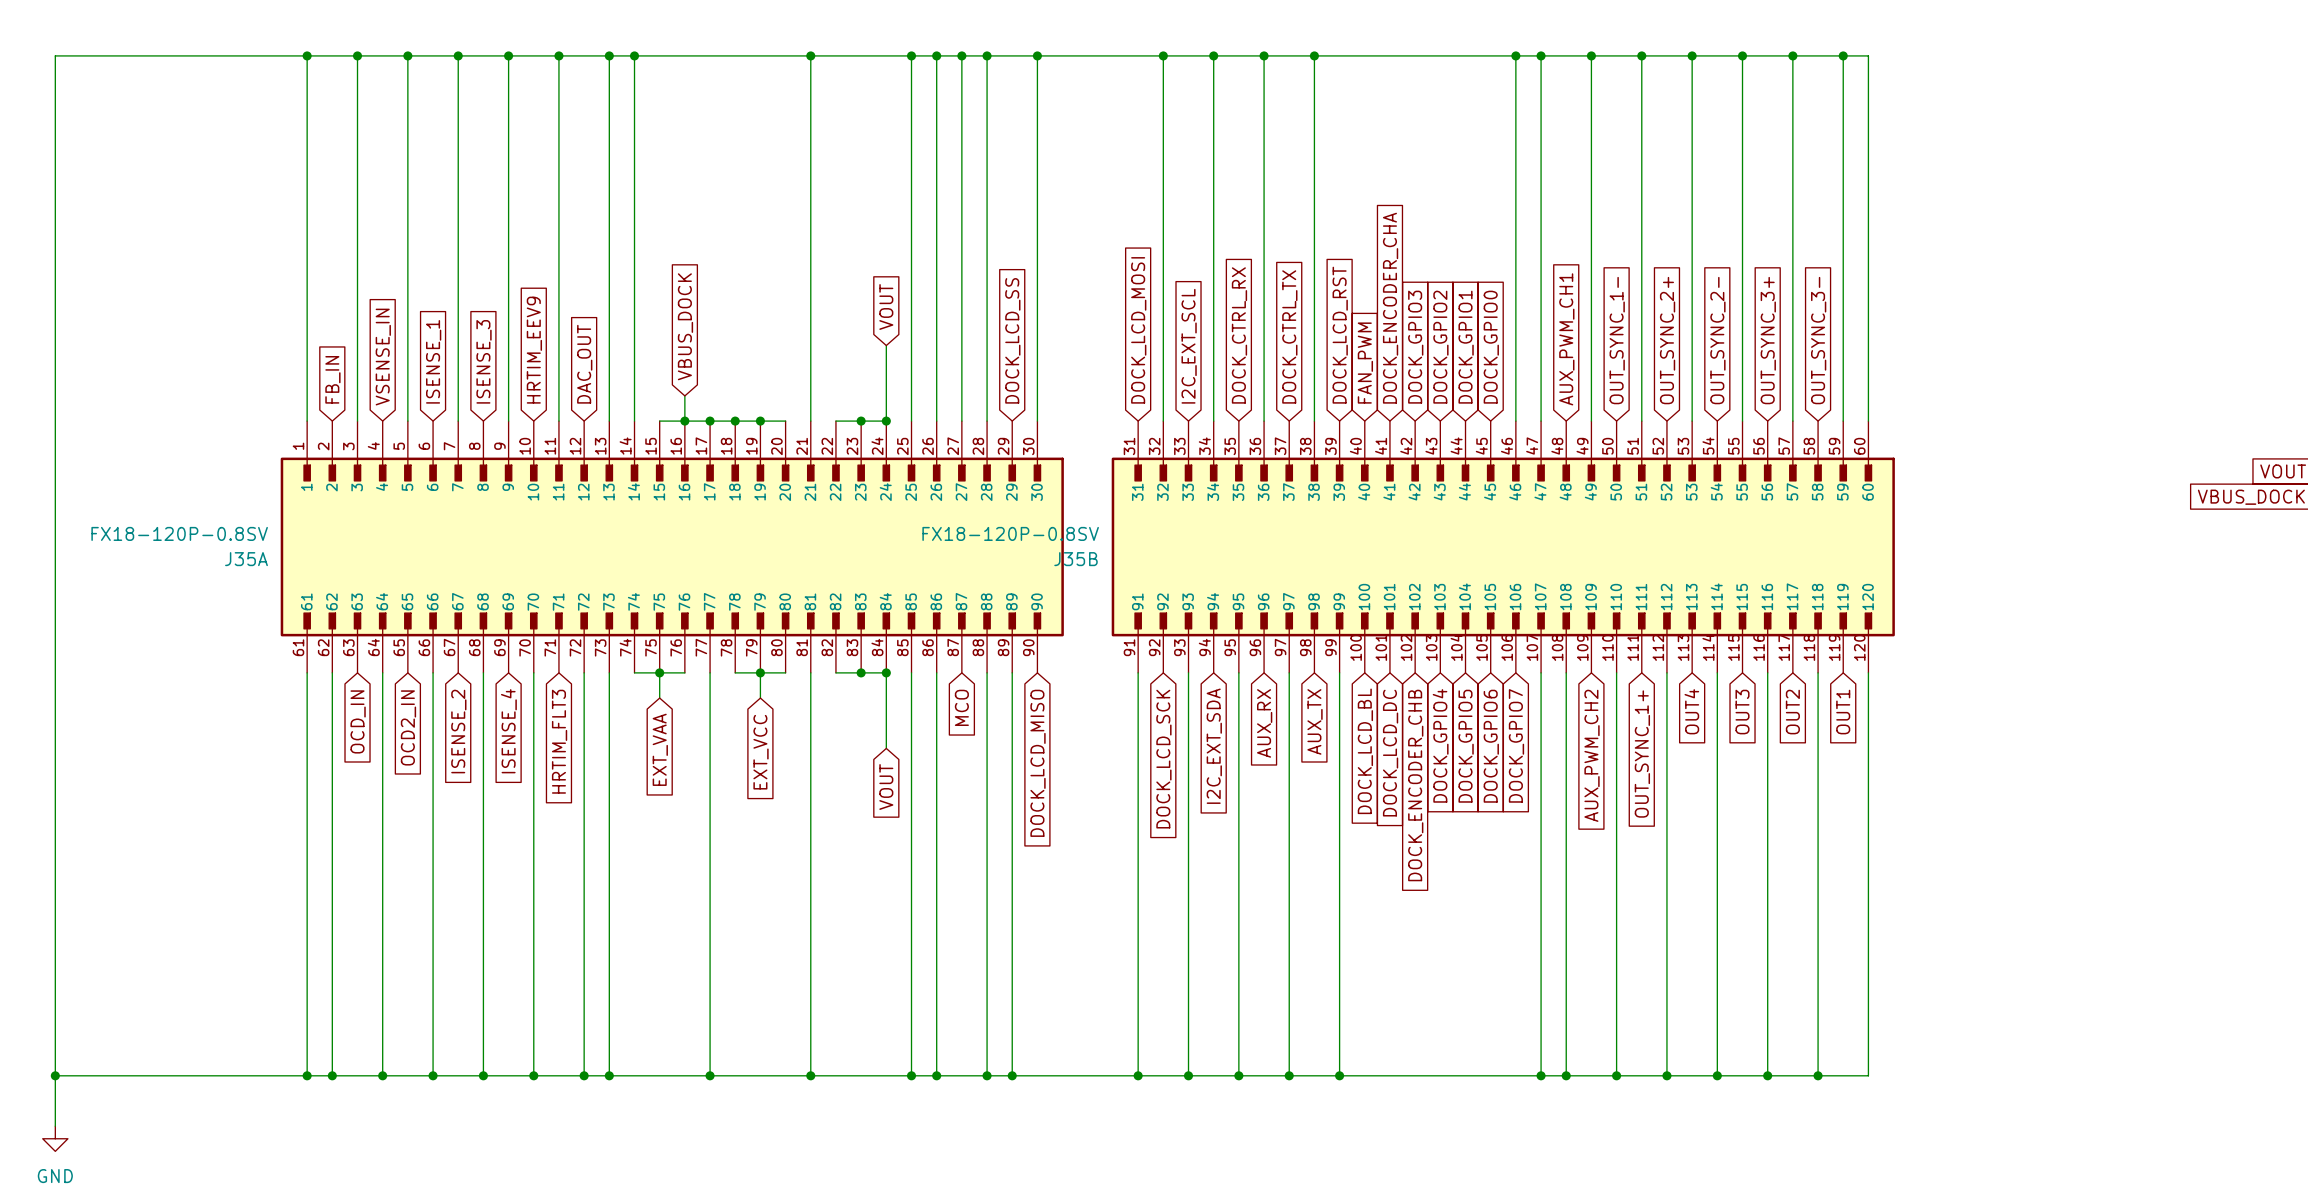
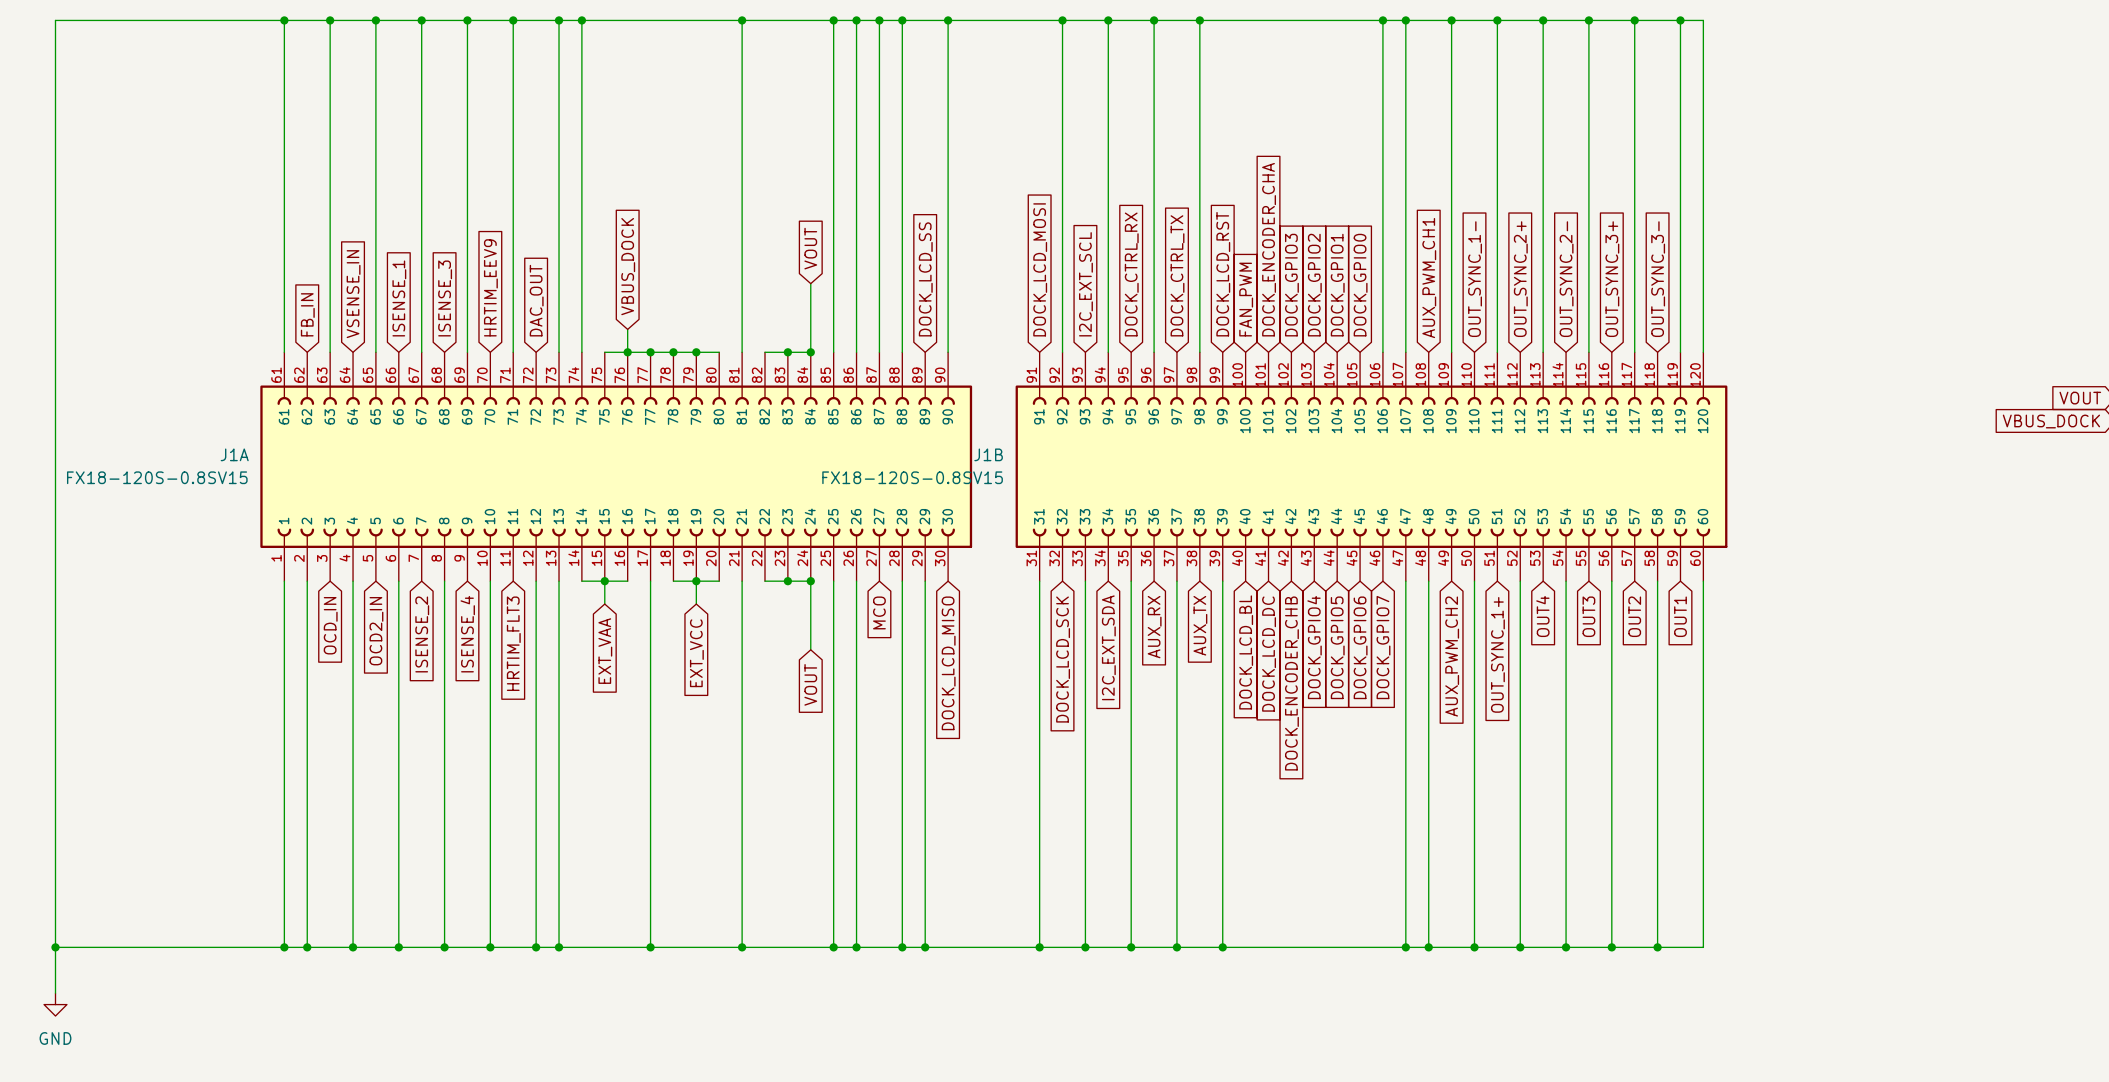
J35A: FX18-120P-0.8SV (672, 546) -> none
J1A: none -> FX18-120S-0.8SV15 (616, 466)
J35B: FX18-120P-0.8SV (1503, 546) -> none
J1B: none -> FX18-120S-0.8SV15 (1371, 466)

